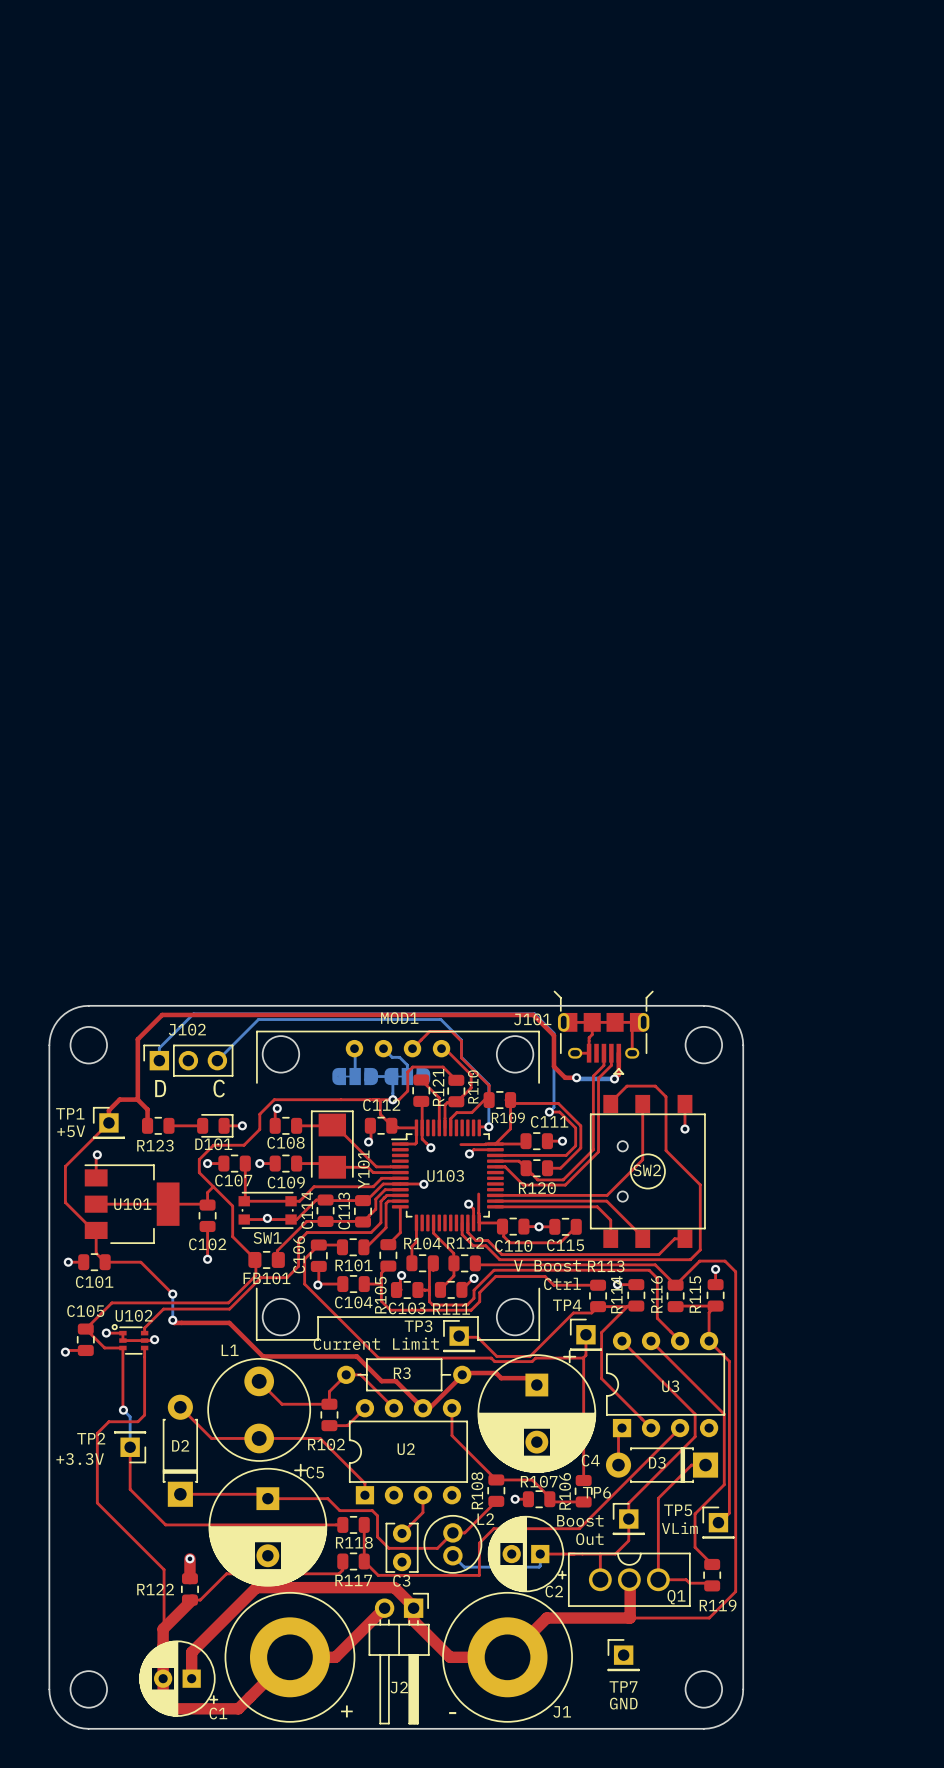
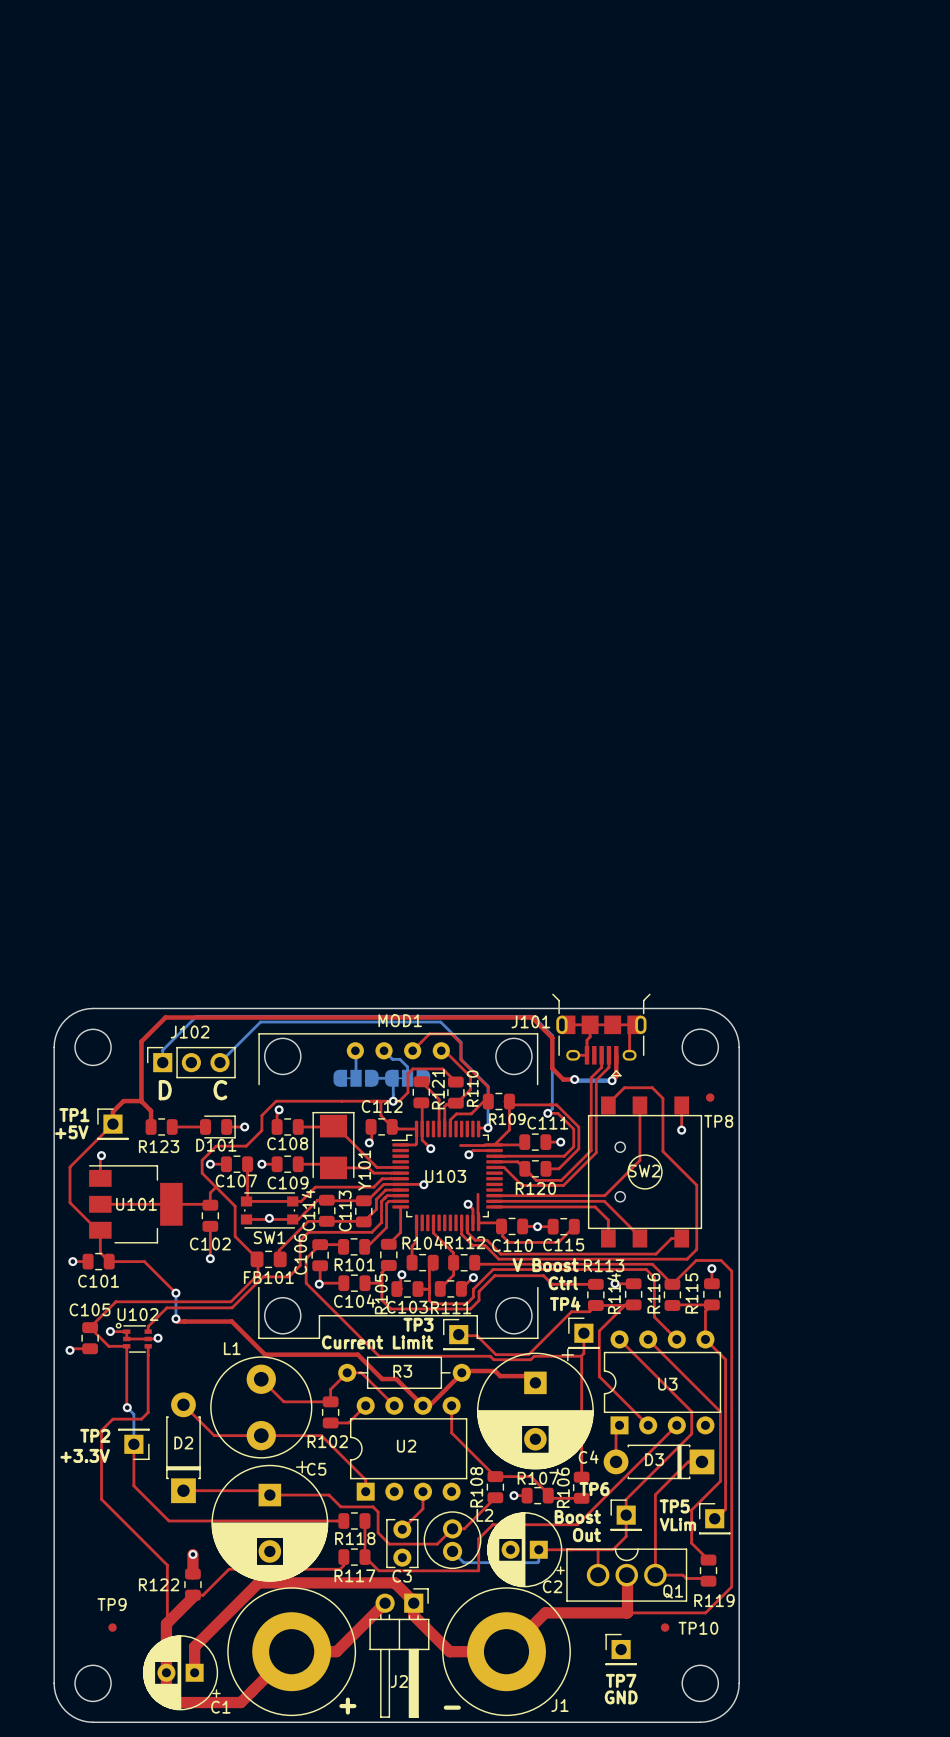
TP8: none -> (710, 1097)
TP9: none -> (112, 1627)
TP10: none -> (665, 1627)

